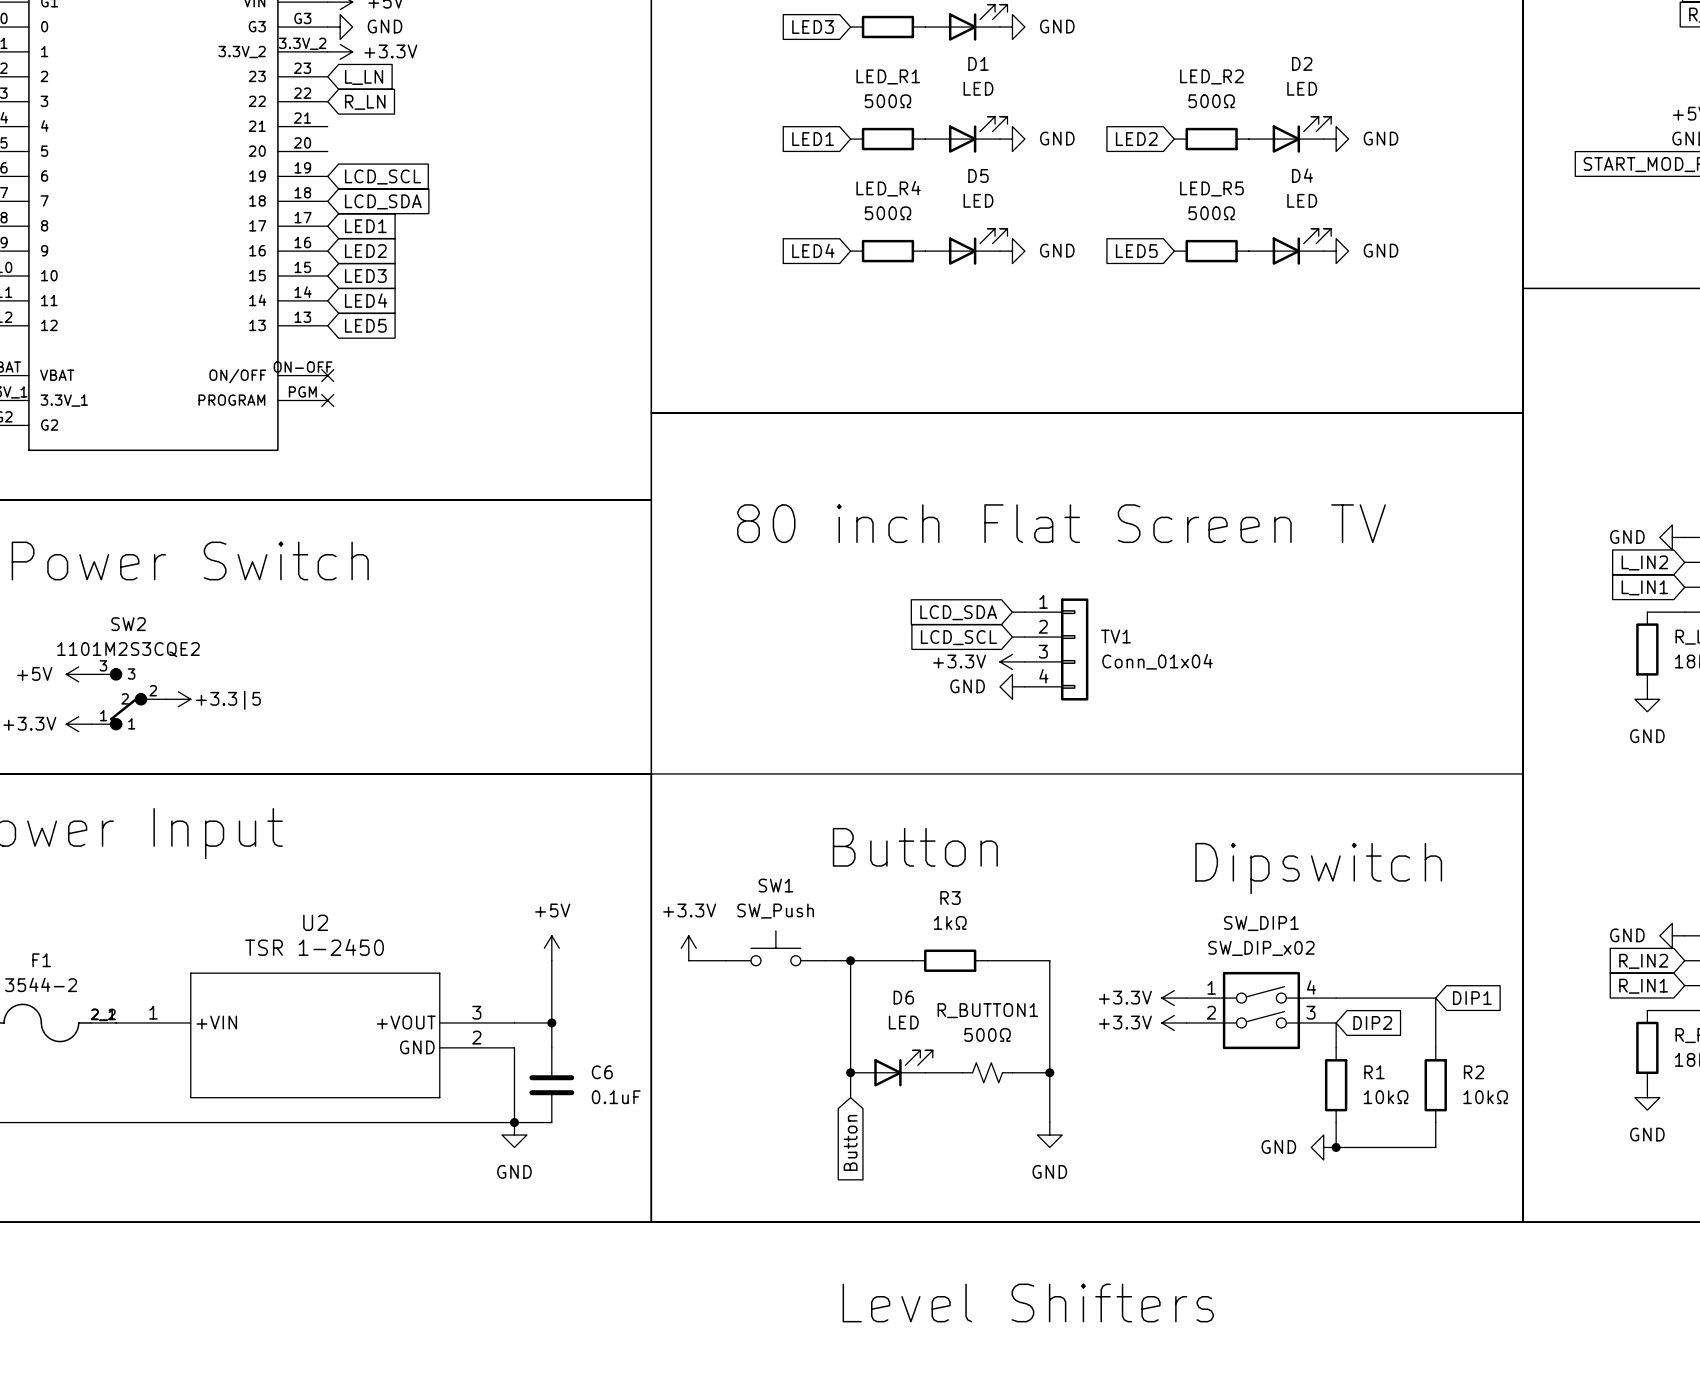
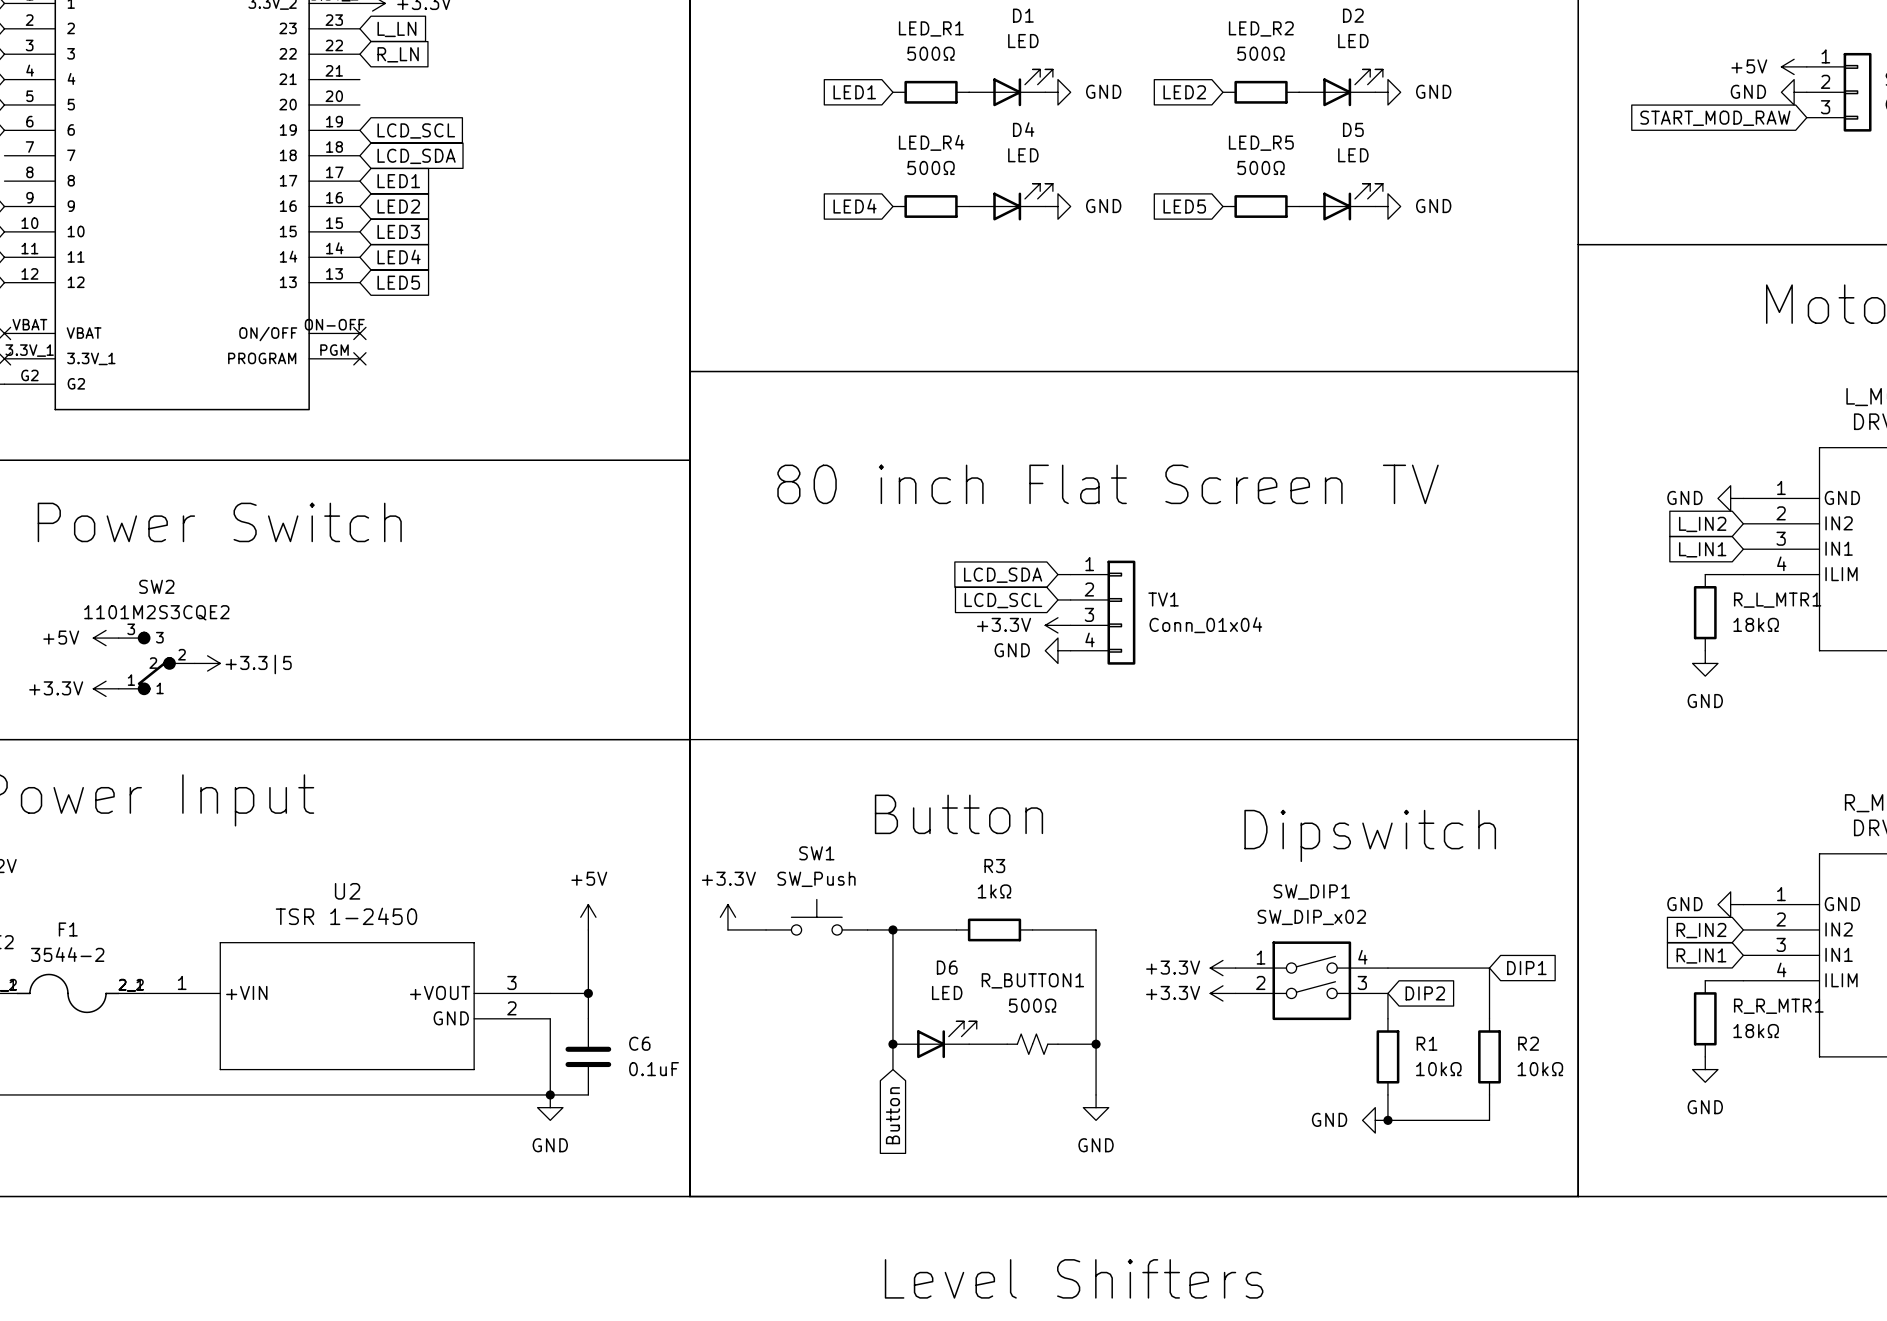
D5 name: D5 (978, 175) -> D4 (1023, 129)
D4 name: D4 (1302, 175) -> D5 (1353, 129)

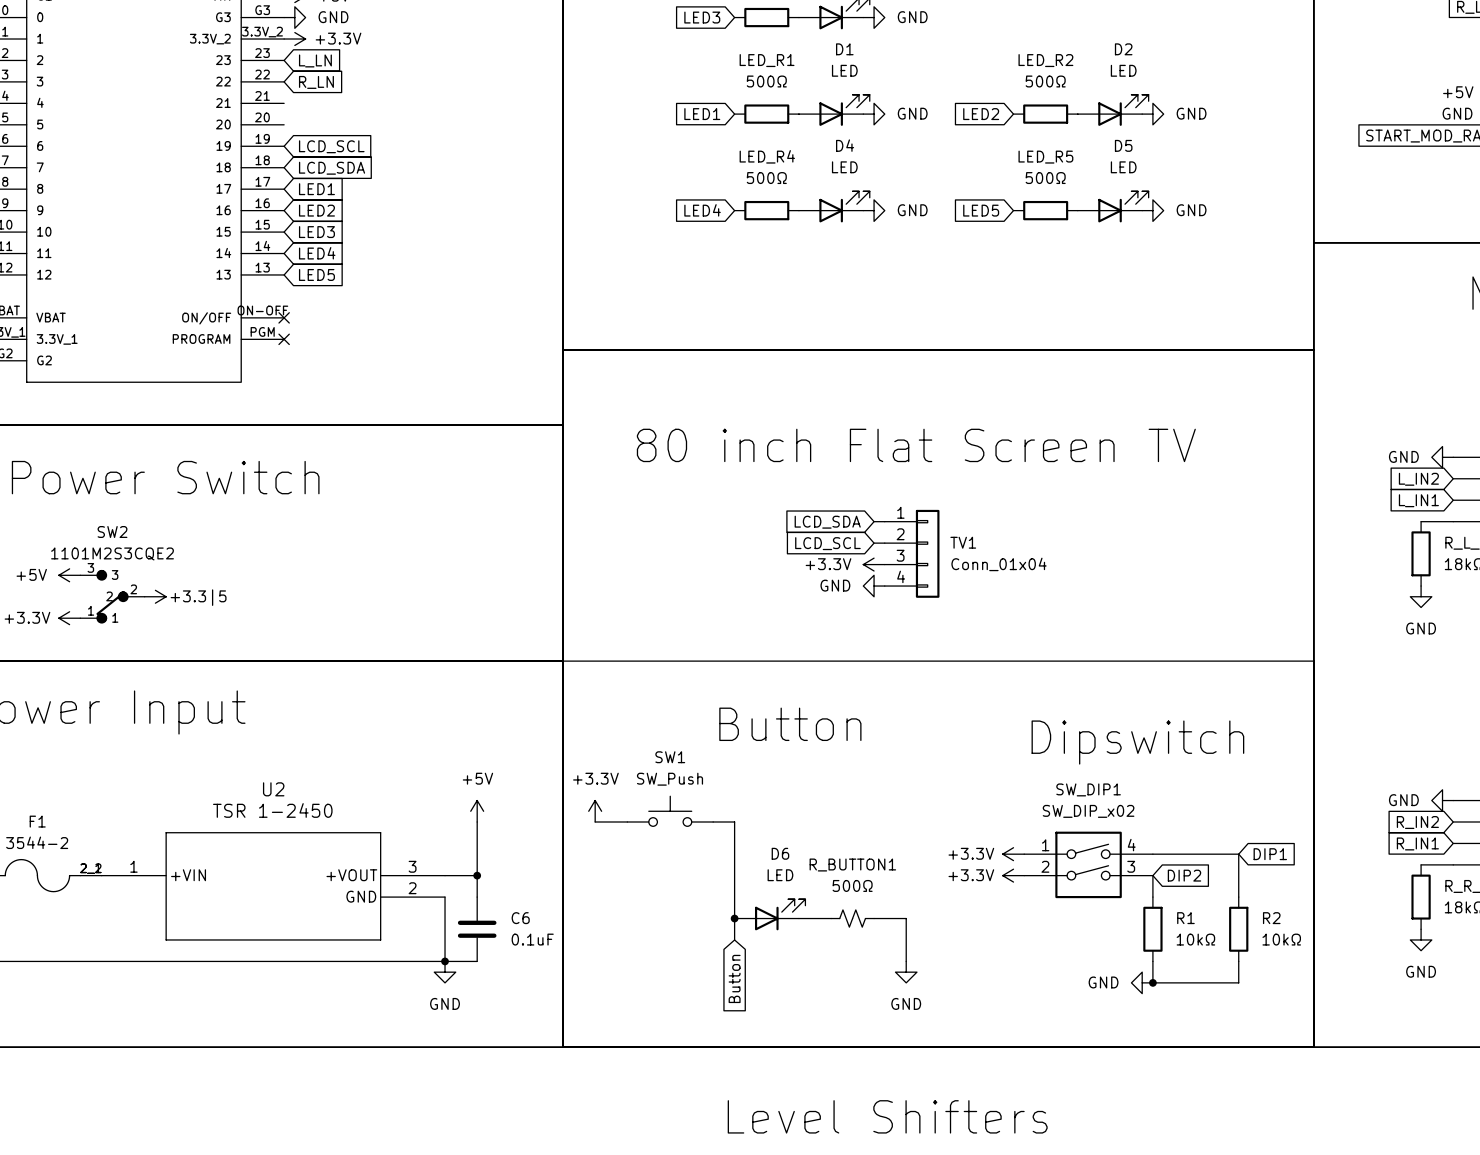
wire: (892, 929) (956, 929) -> none
junction: (892, 929) -> none
R3: 1kΩ (994, 929) -> none
wire: (1032, 929) (1096, 929) (1096, 1044) -> none
junction: (1096, 1044) -> none

